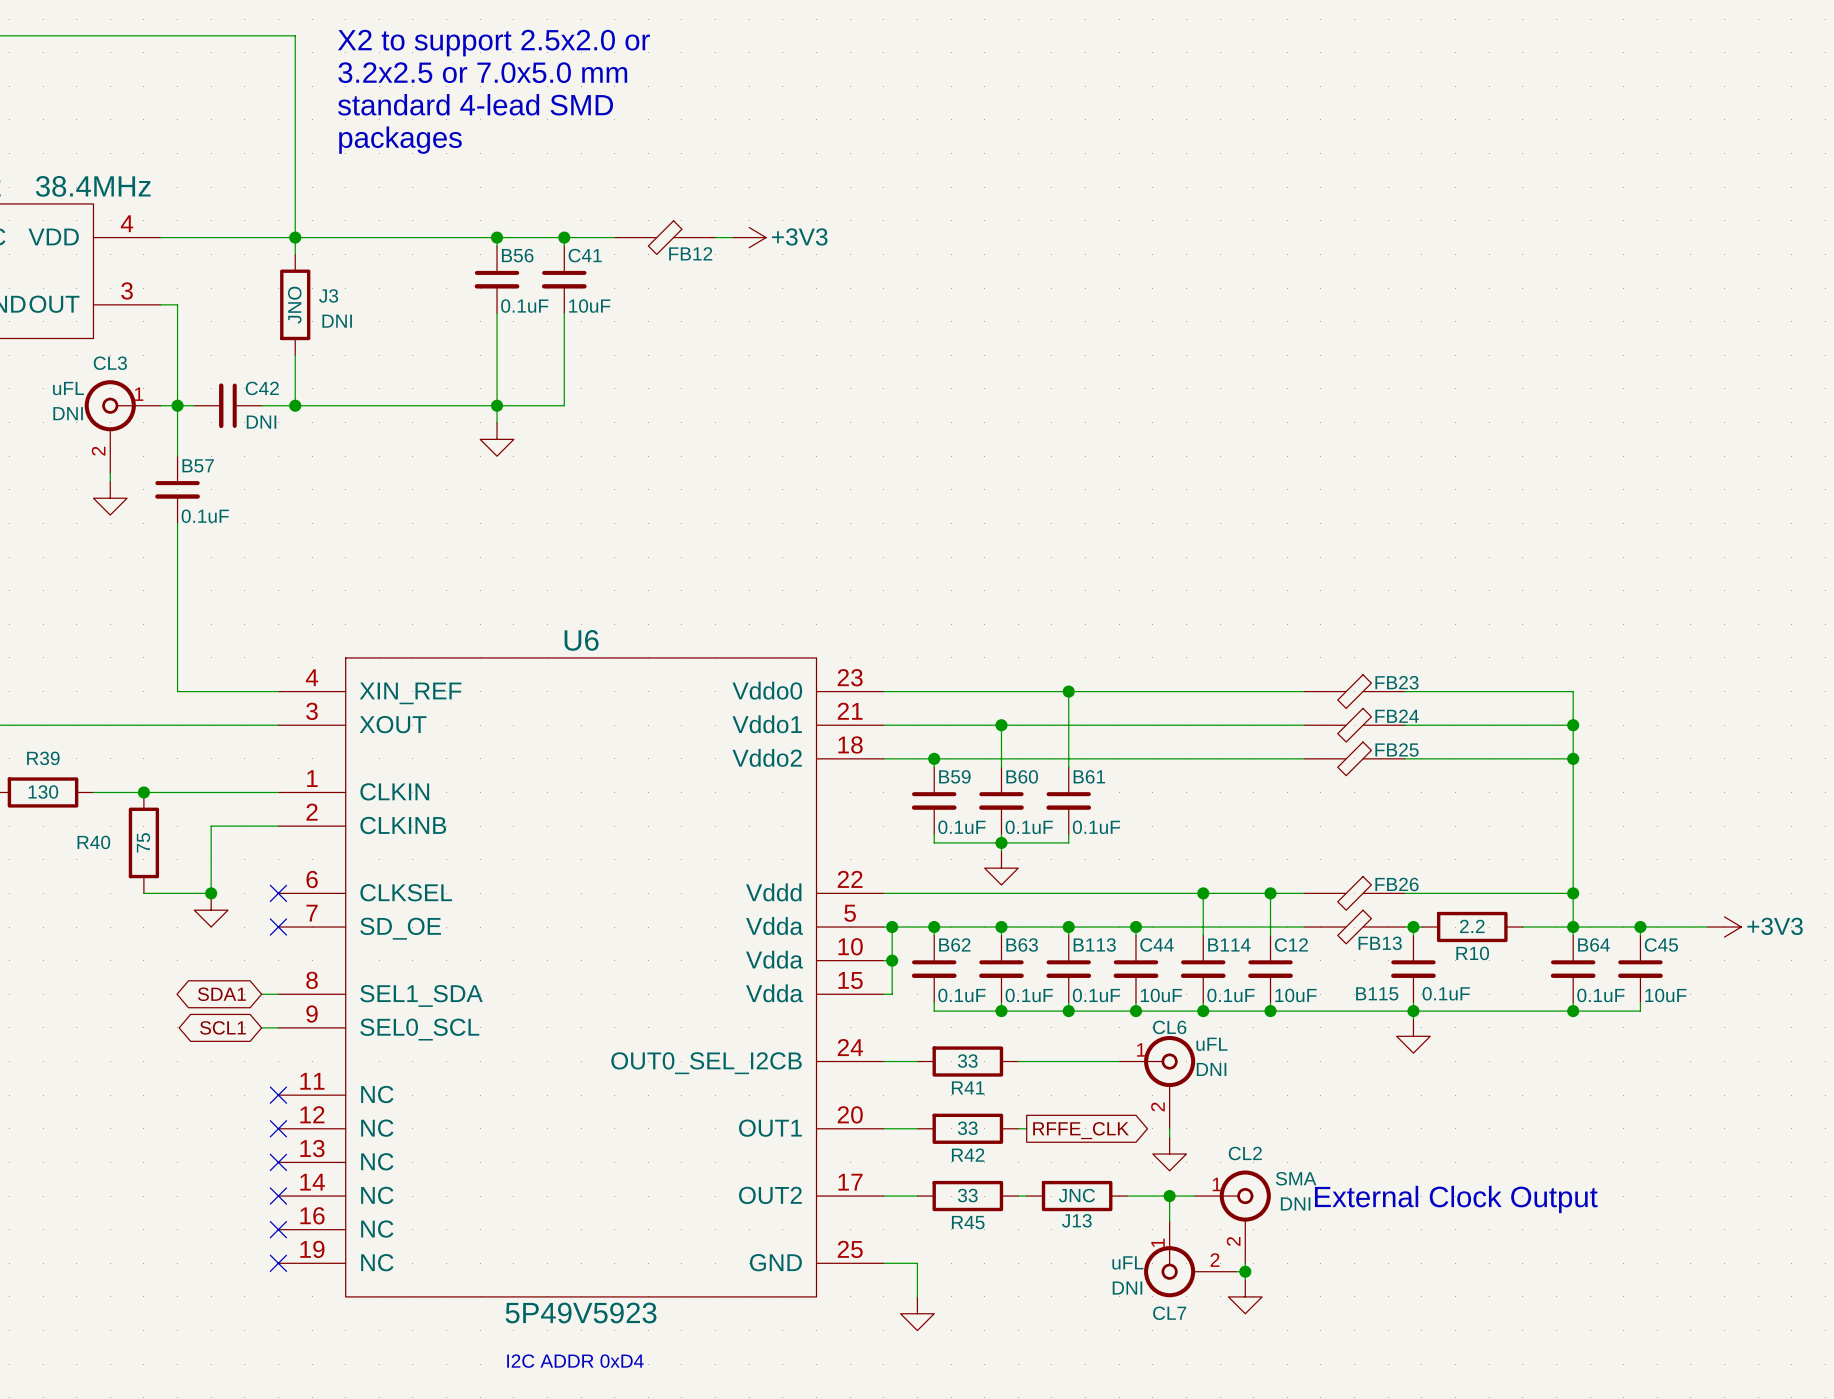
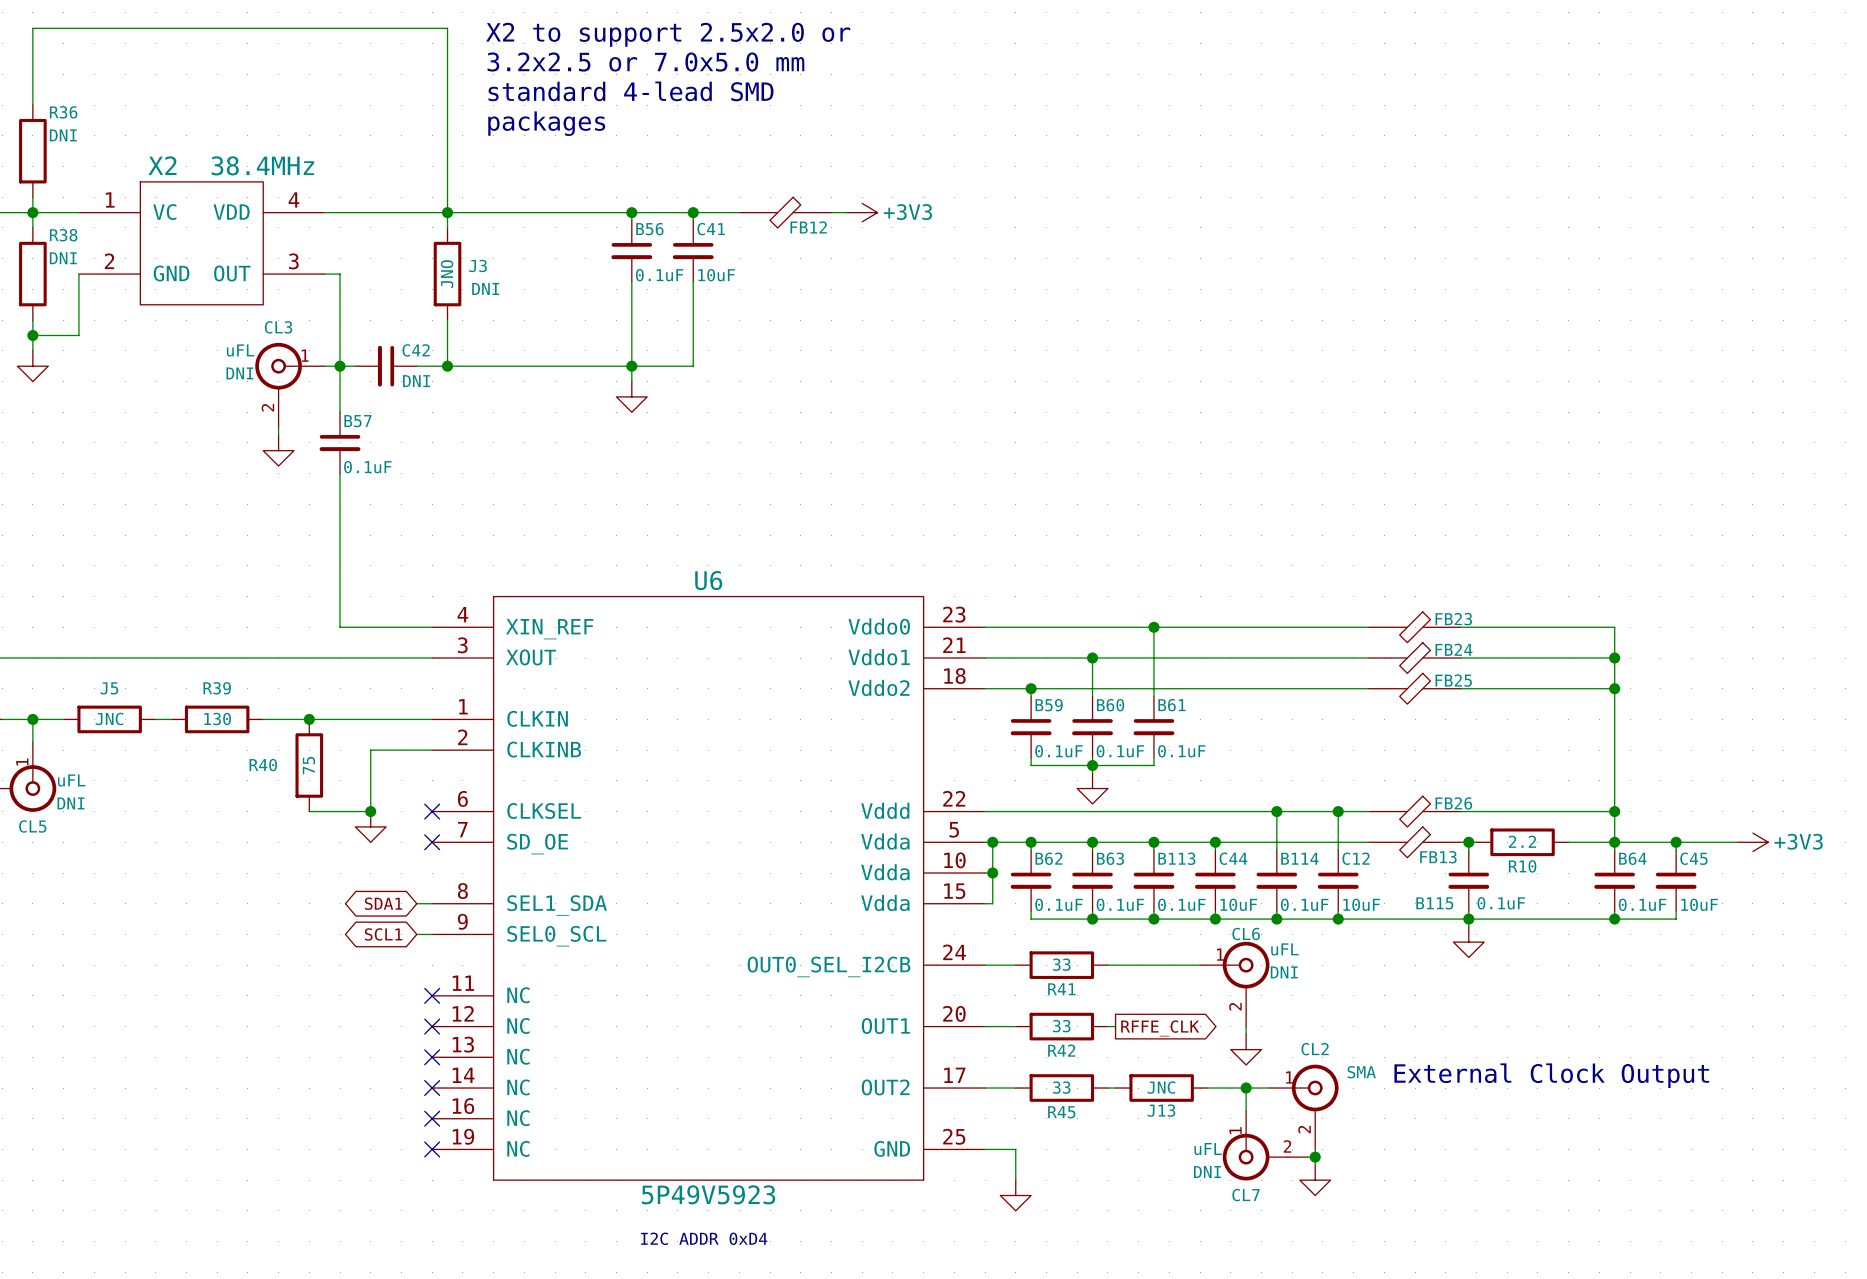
text position: External Clock Output (1456, 1199) -> External Clock Output (1551, 1075)
CL2 text: DNI (1295, 1203) -> none

